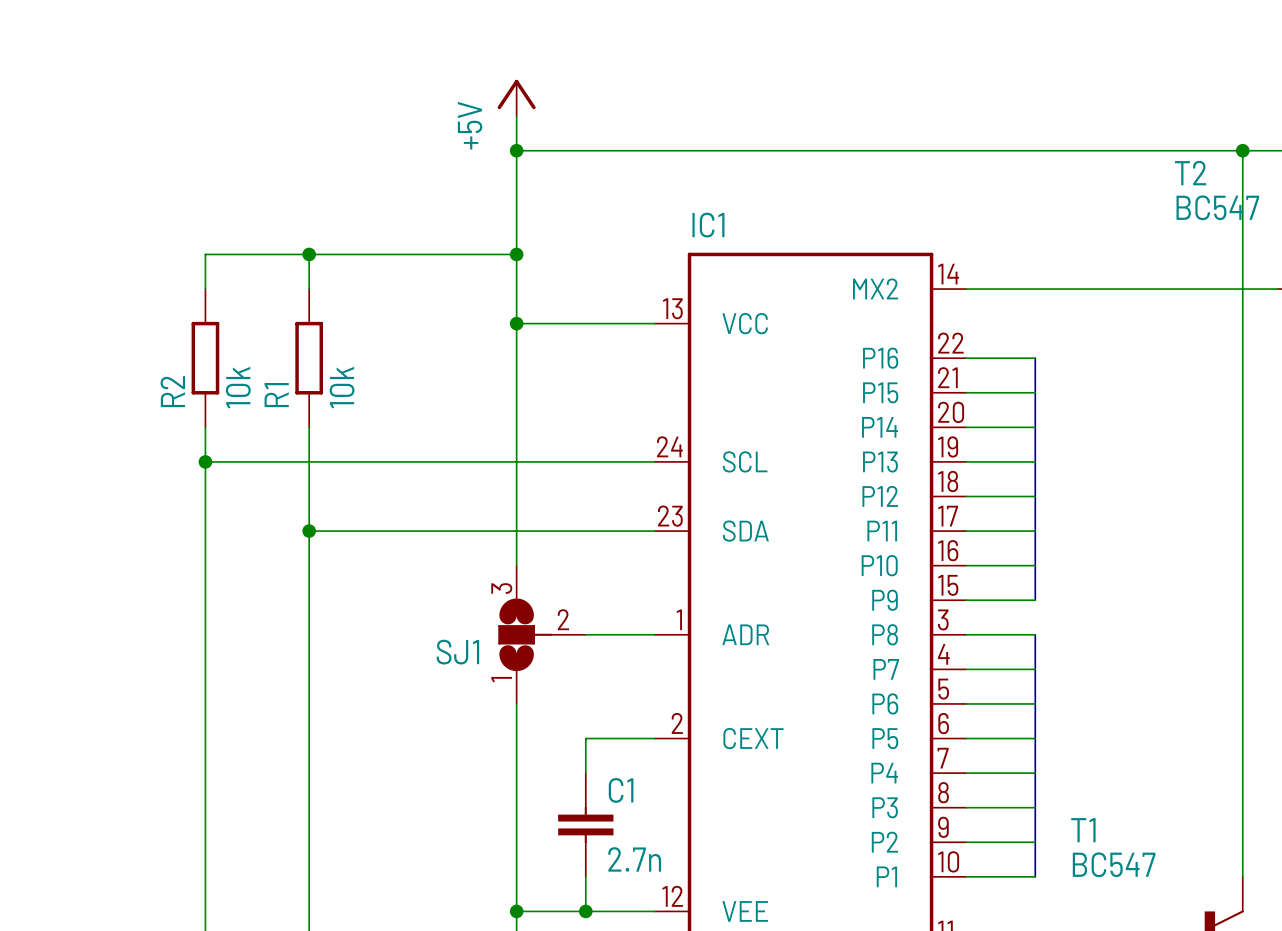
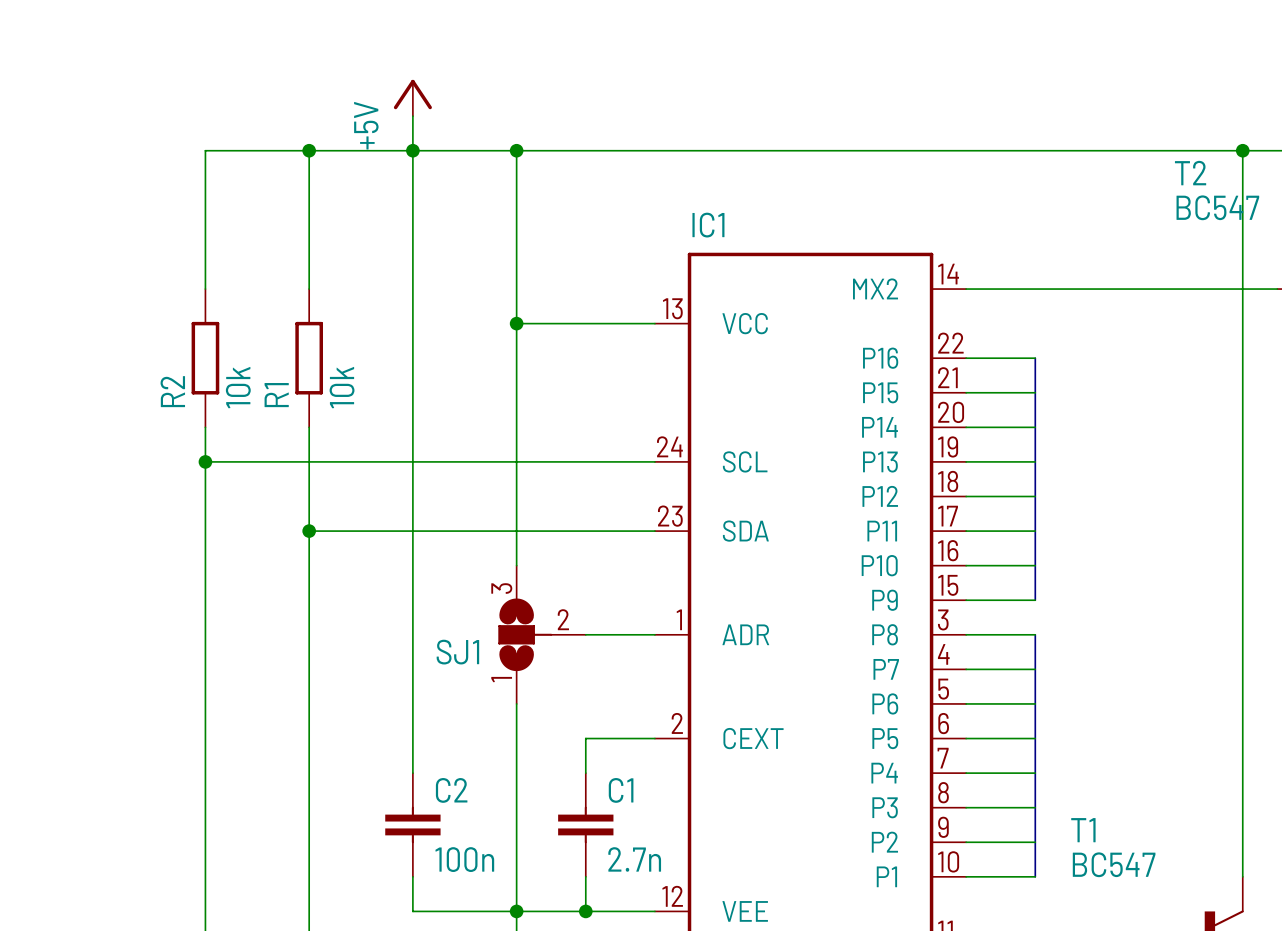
power symbol position: +5V (516, 97) -> +5V (412, 97)
wire: none -> (412, 116) (412, 773)
wire: (516, 116) (516, 150) -> none
wire: none -> (309, 150) (309, 254)
junction: none -> (309, 150)
junction: none -> (412, 150)
wire: (205, 254) (516, 254) -> (205, 254) (205, 150) (516, 150)
junction: (309, 254) -> none
junction: (516, 254) -> none
C2: none -> 100n (412, 824)
wire: none -> (412, 876) (412, 911) (516, 911)

